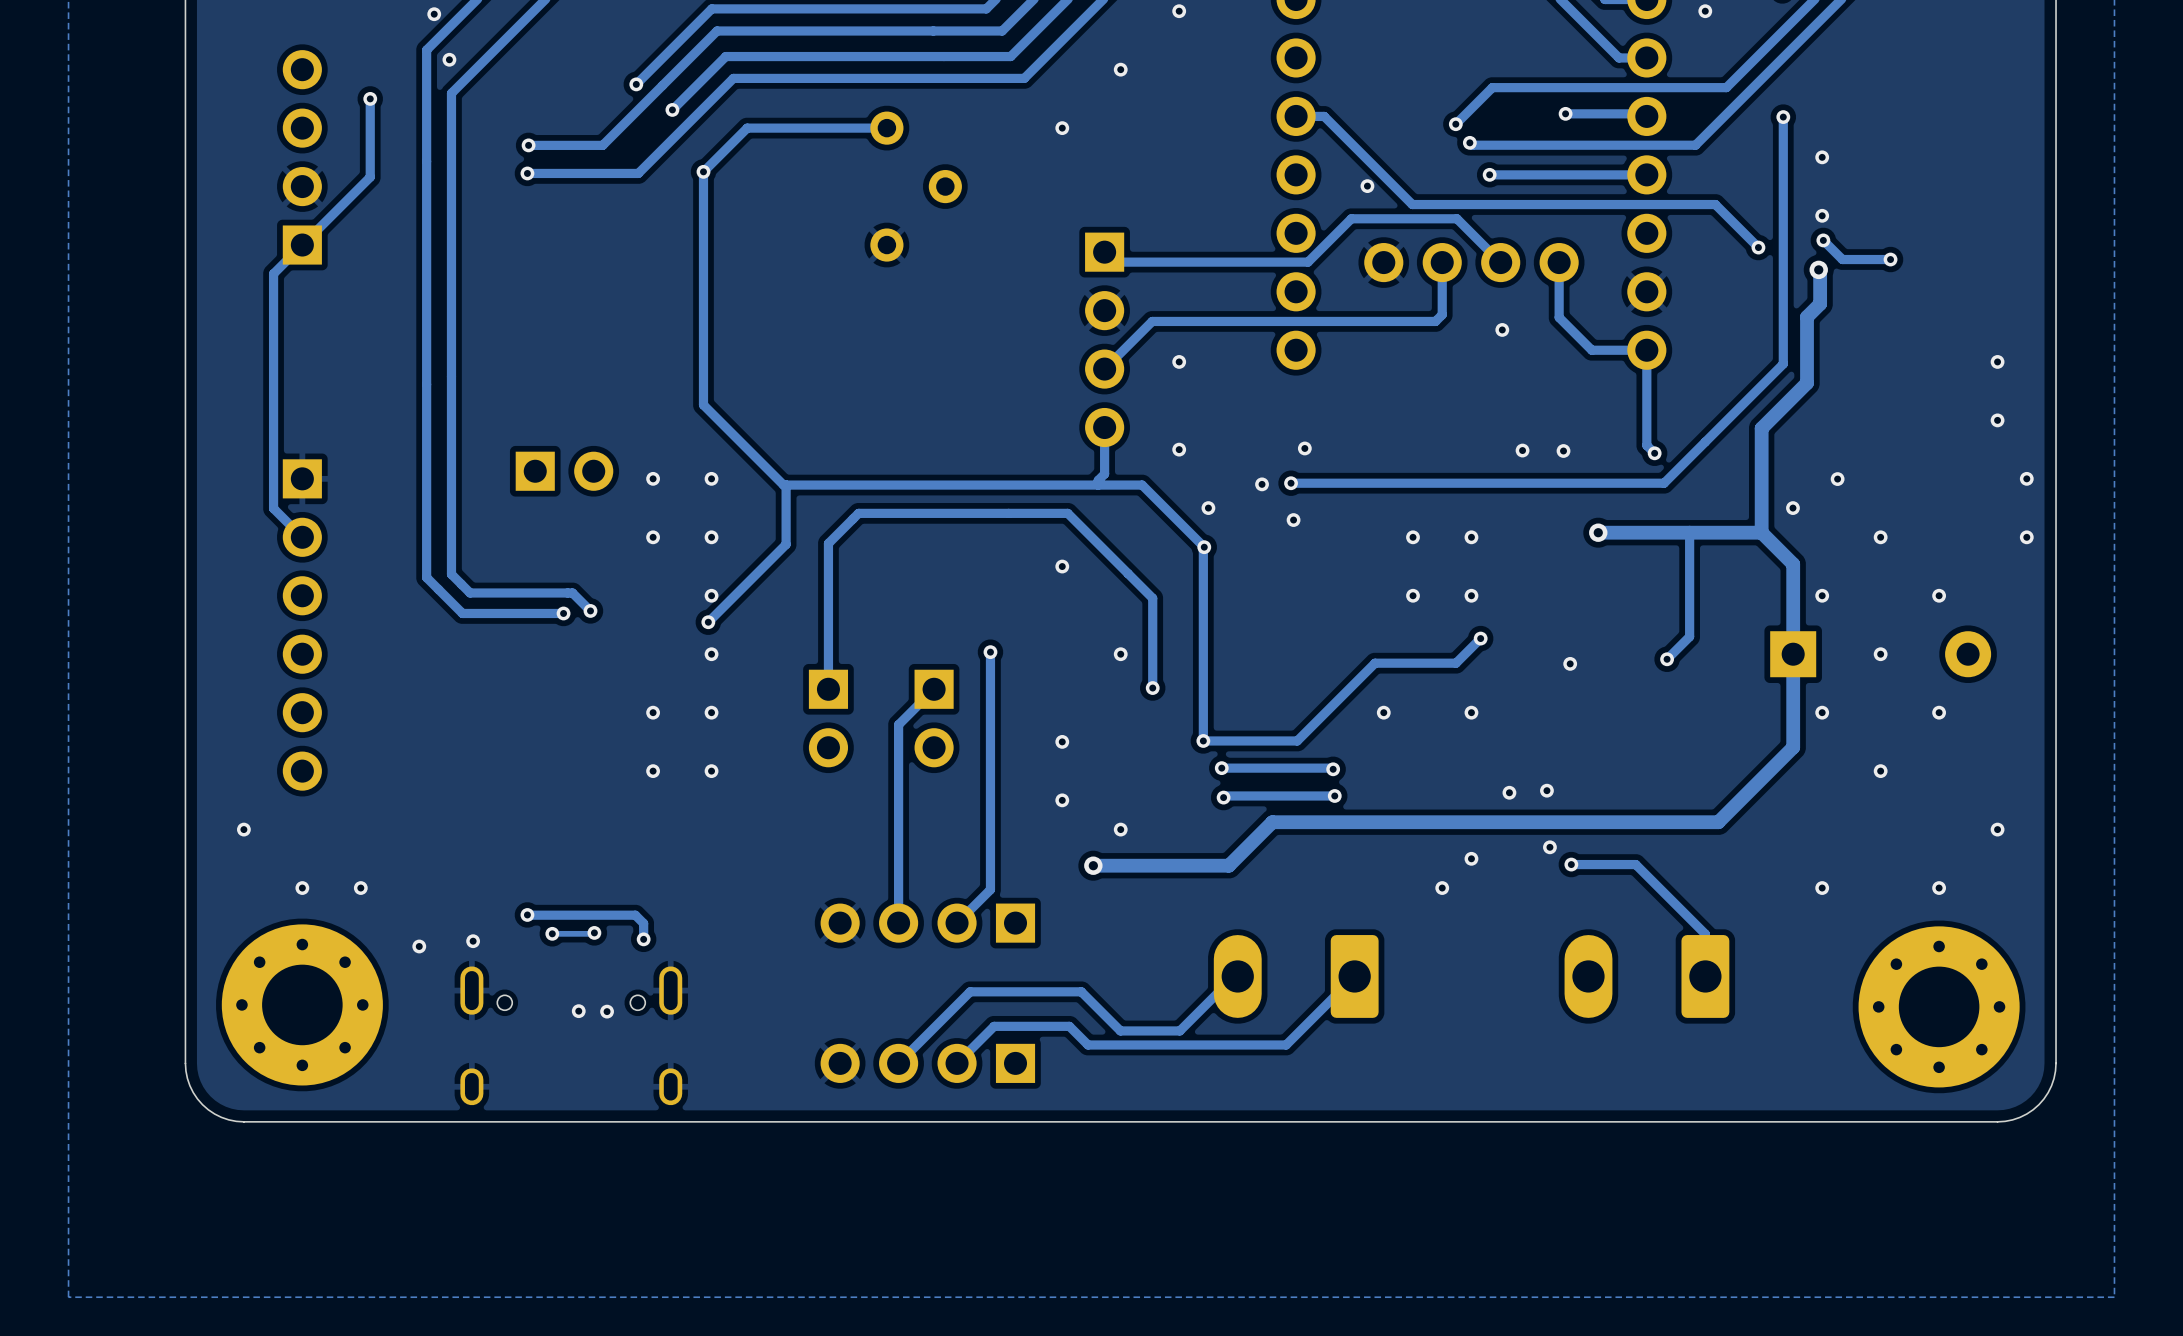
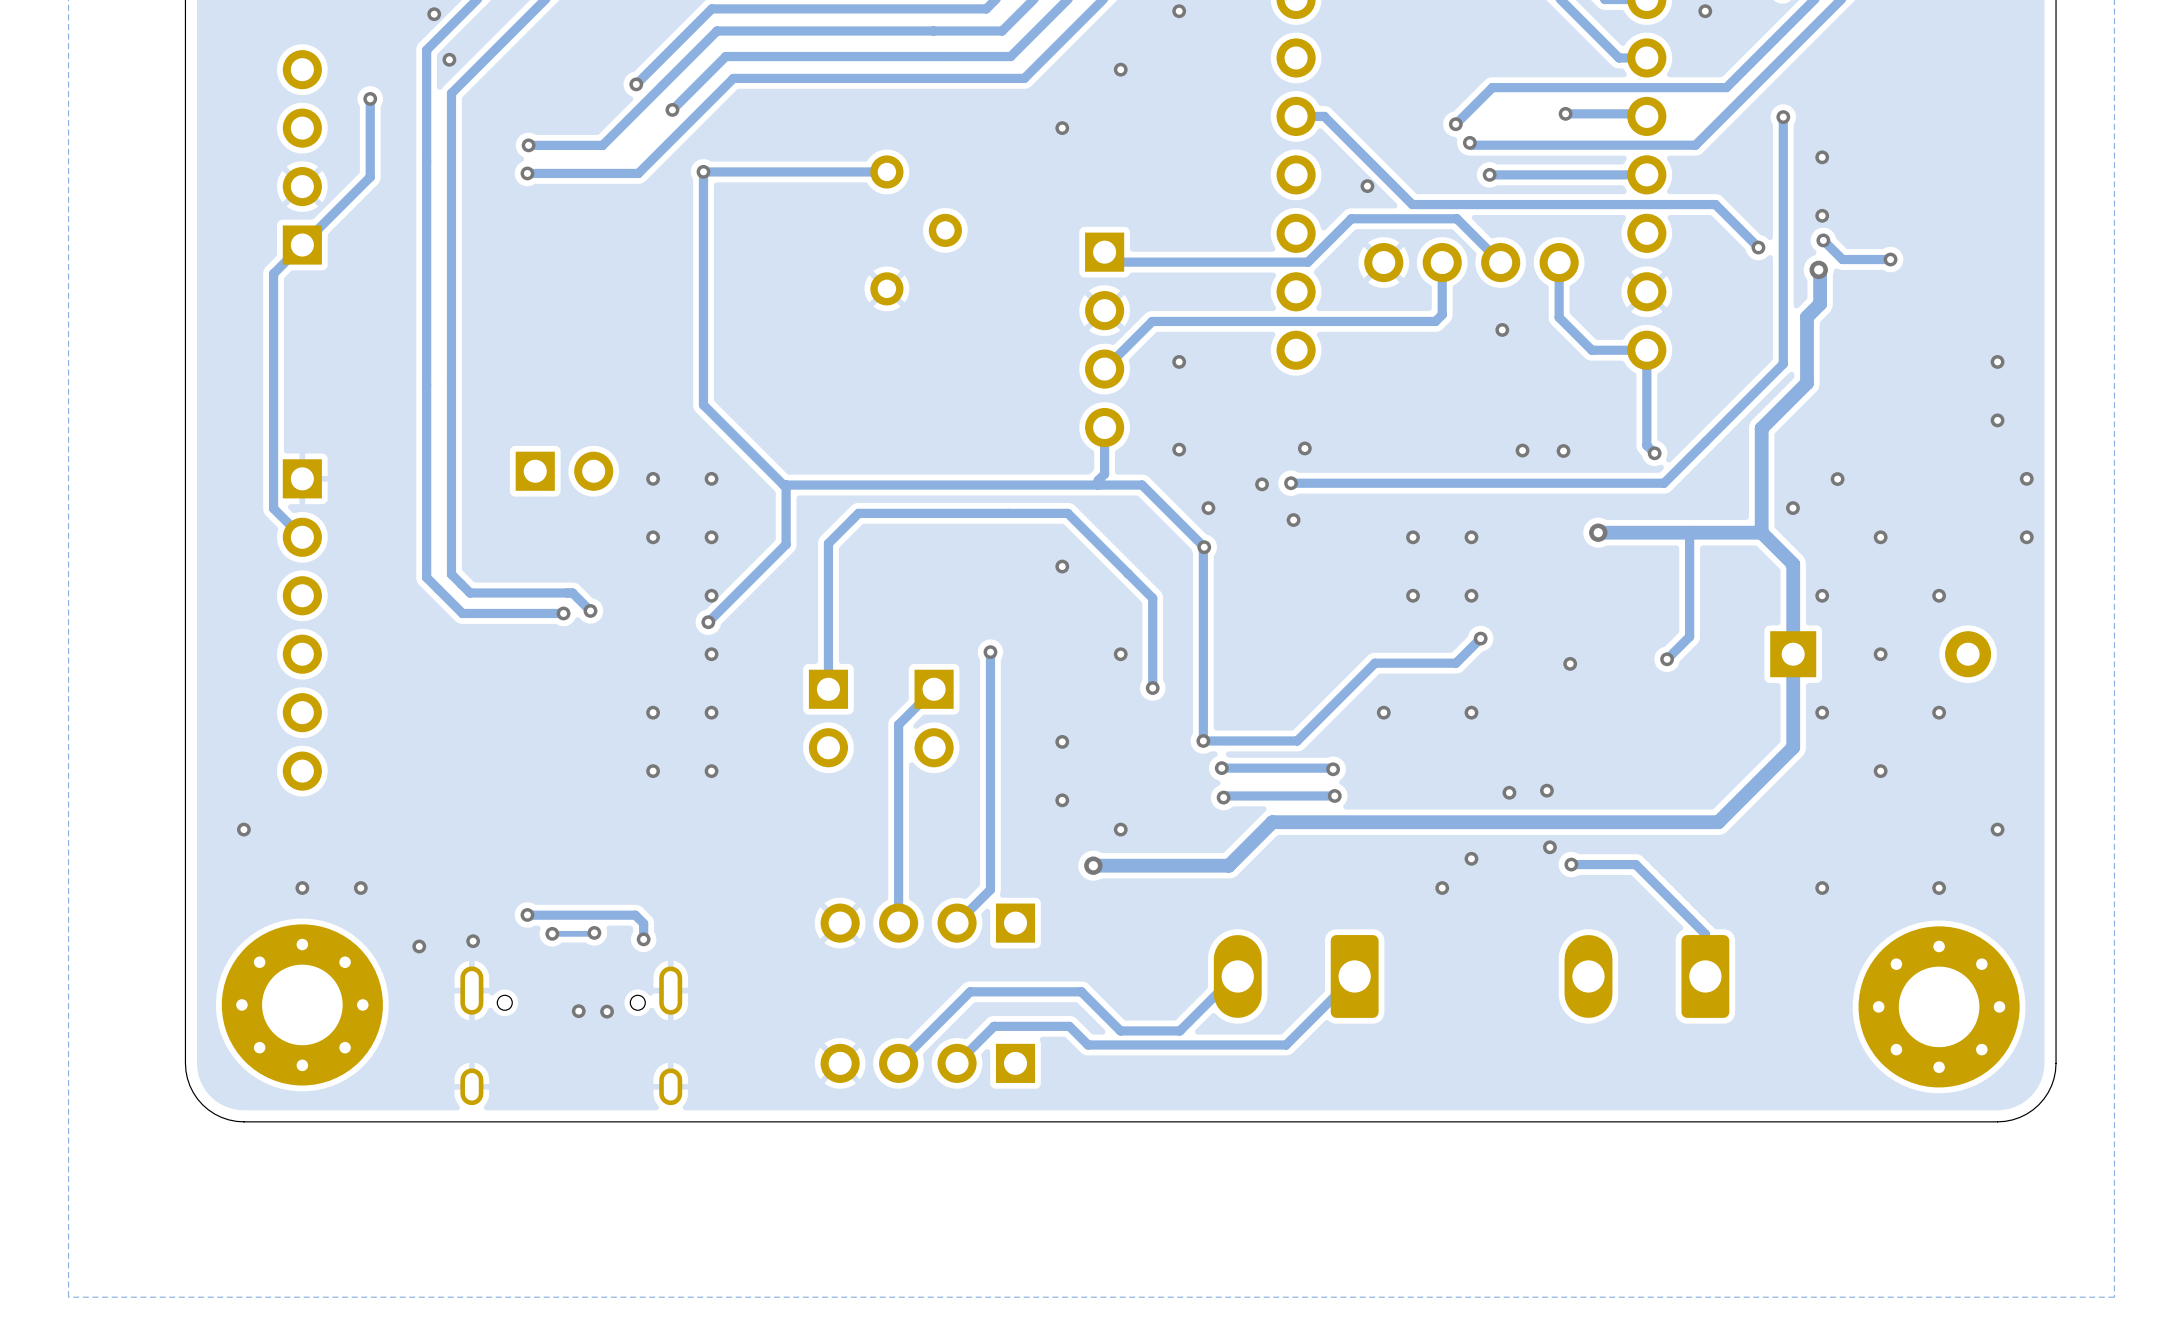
track: (886, 128) (747, 128) (703, 171) -> (886, 171) (703, 171)
part position: (916, 186) -> (916, 230)

